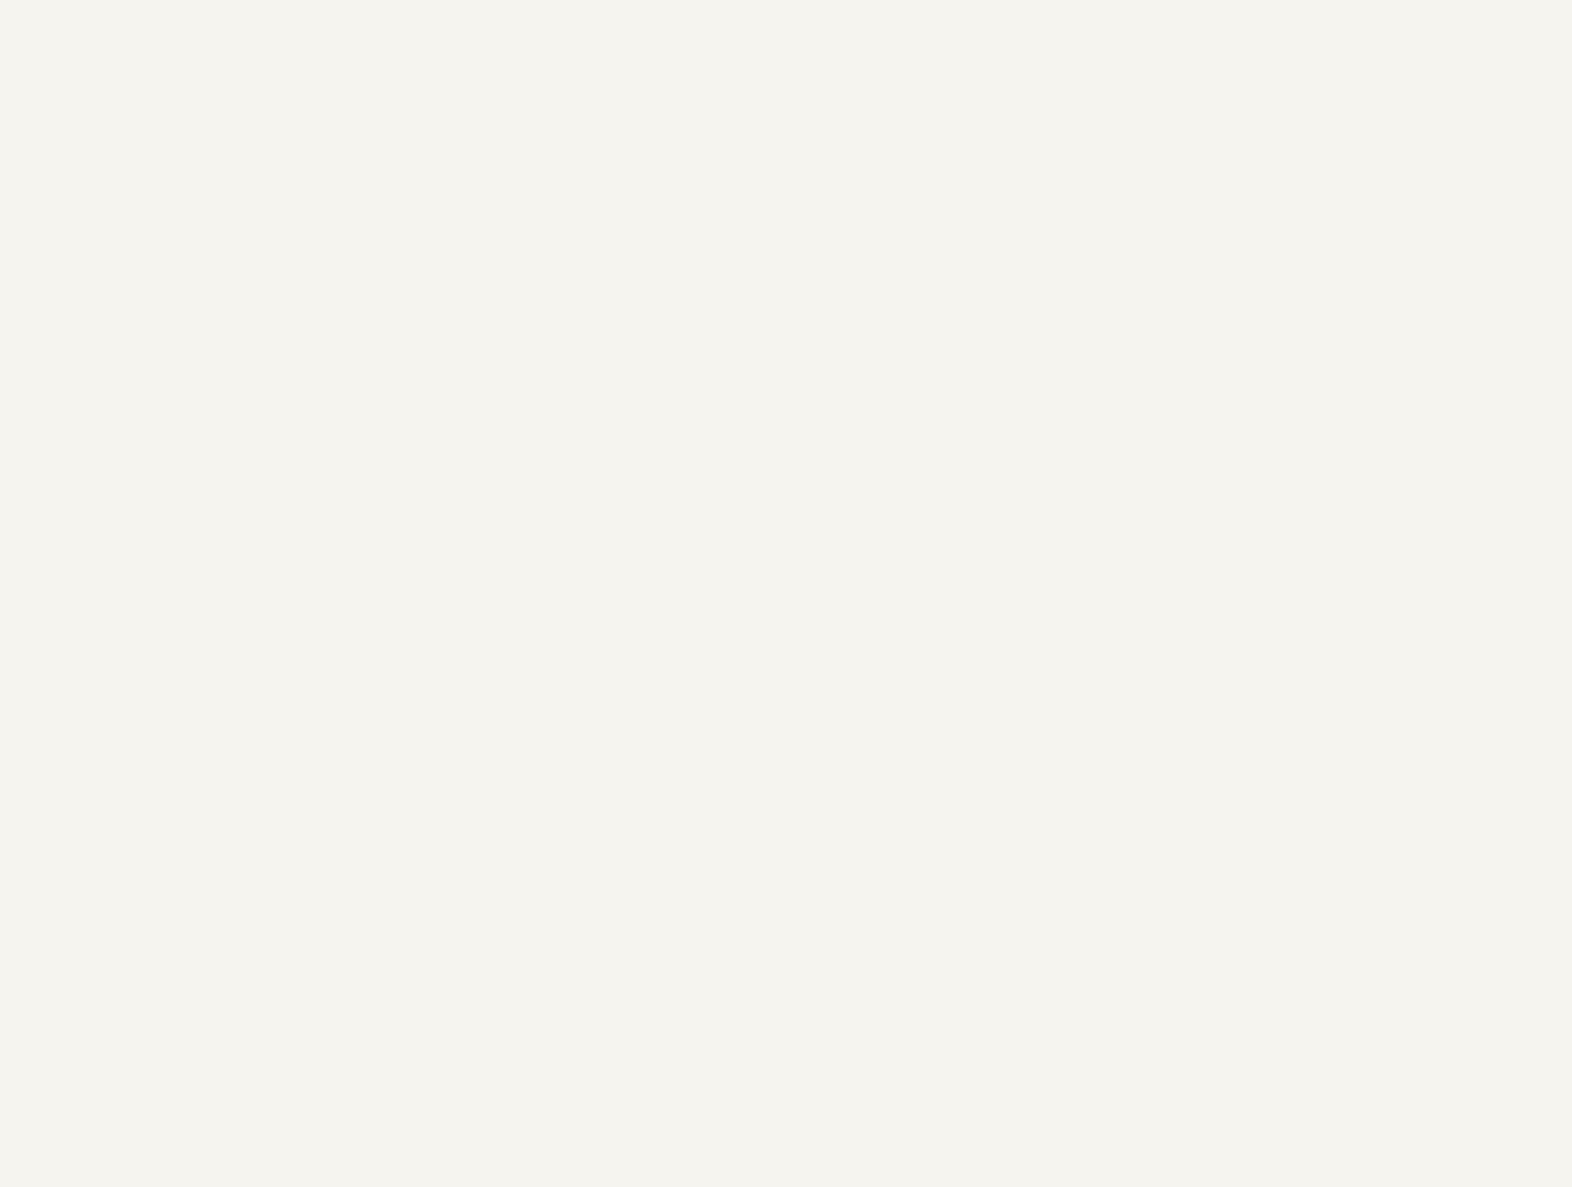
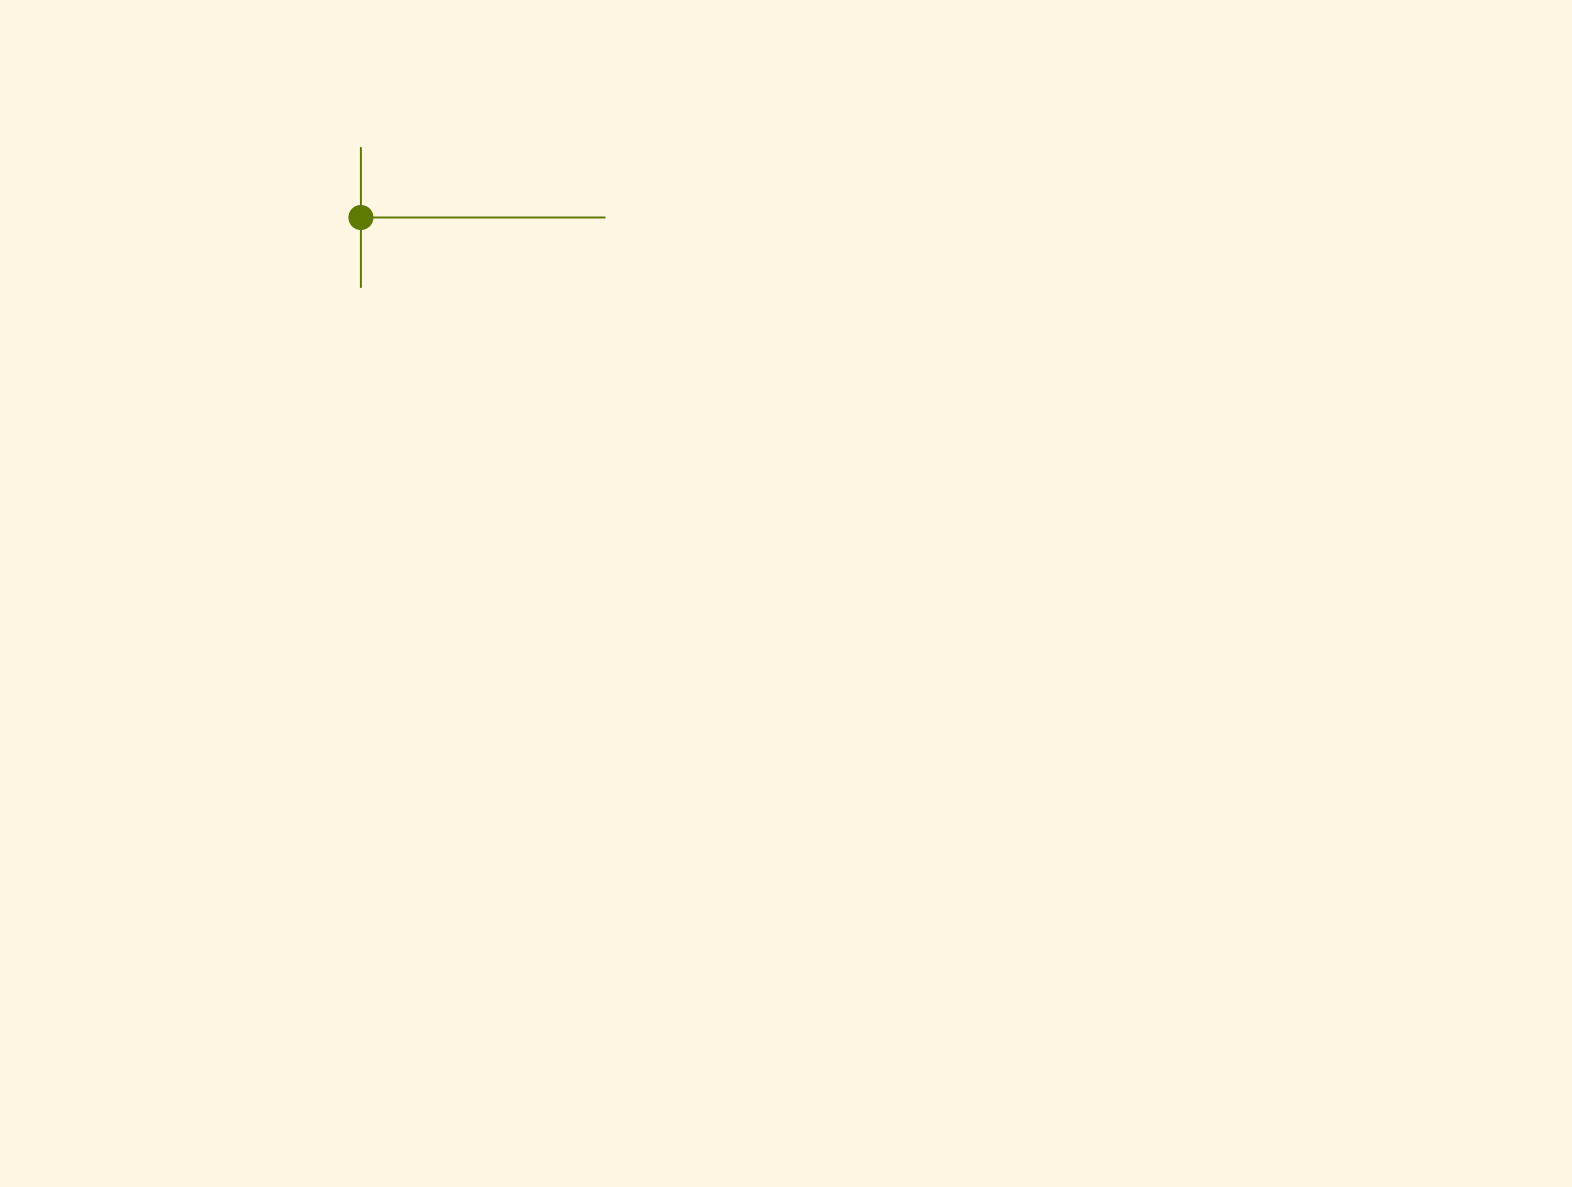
wire: none -> (360, 147) (360, 287)
wire: none -> (360, 217) (604, 217)
junction: none -> (360, 217)

